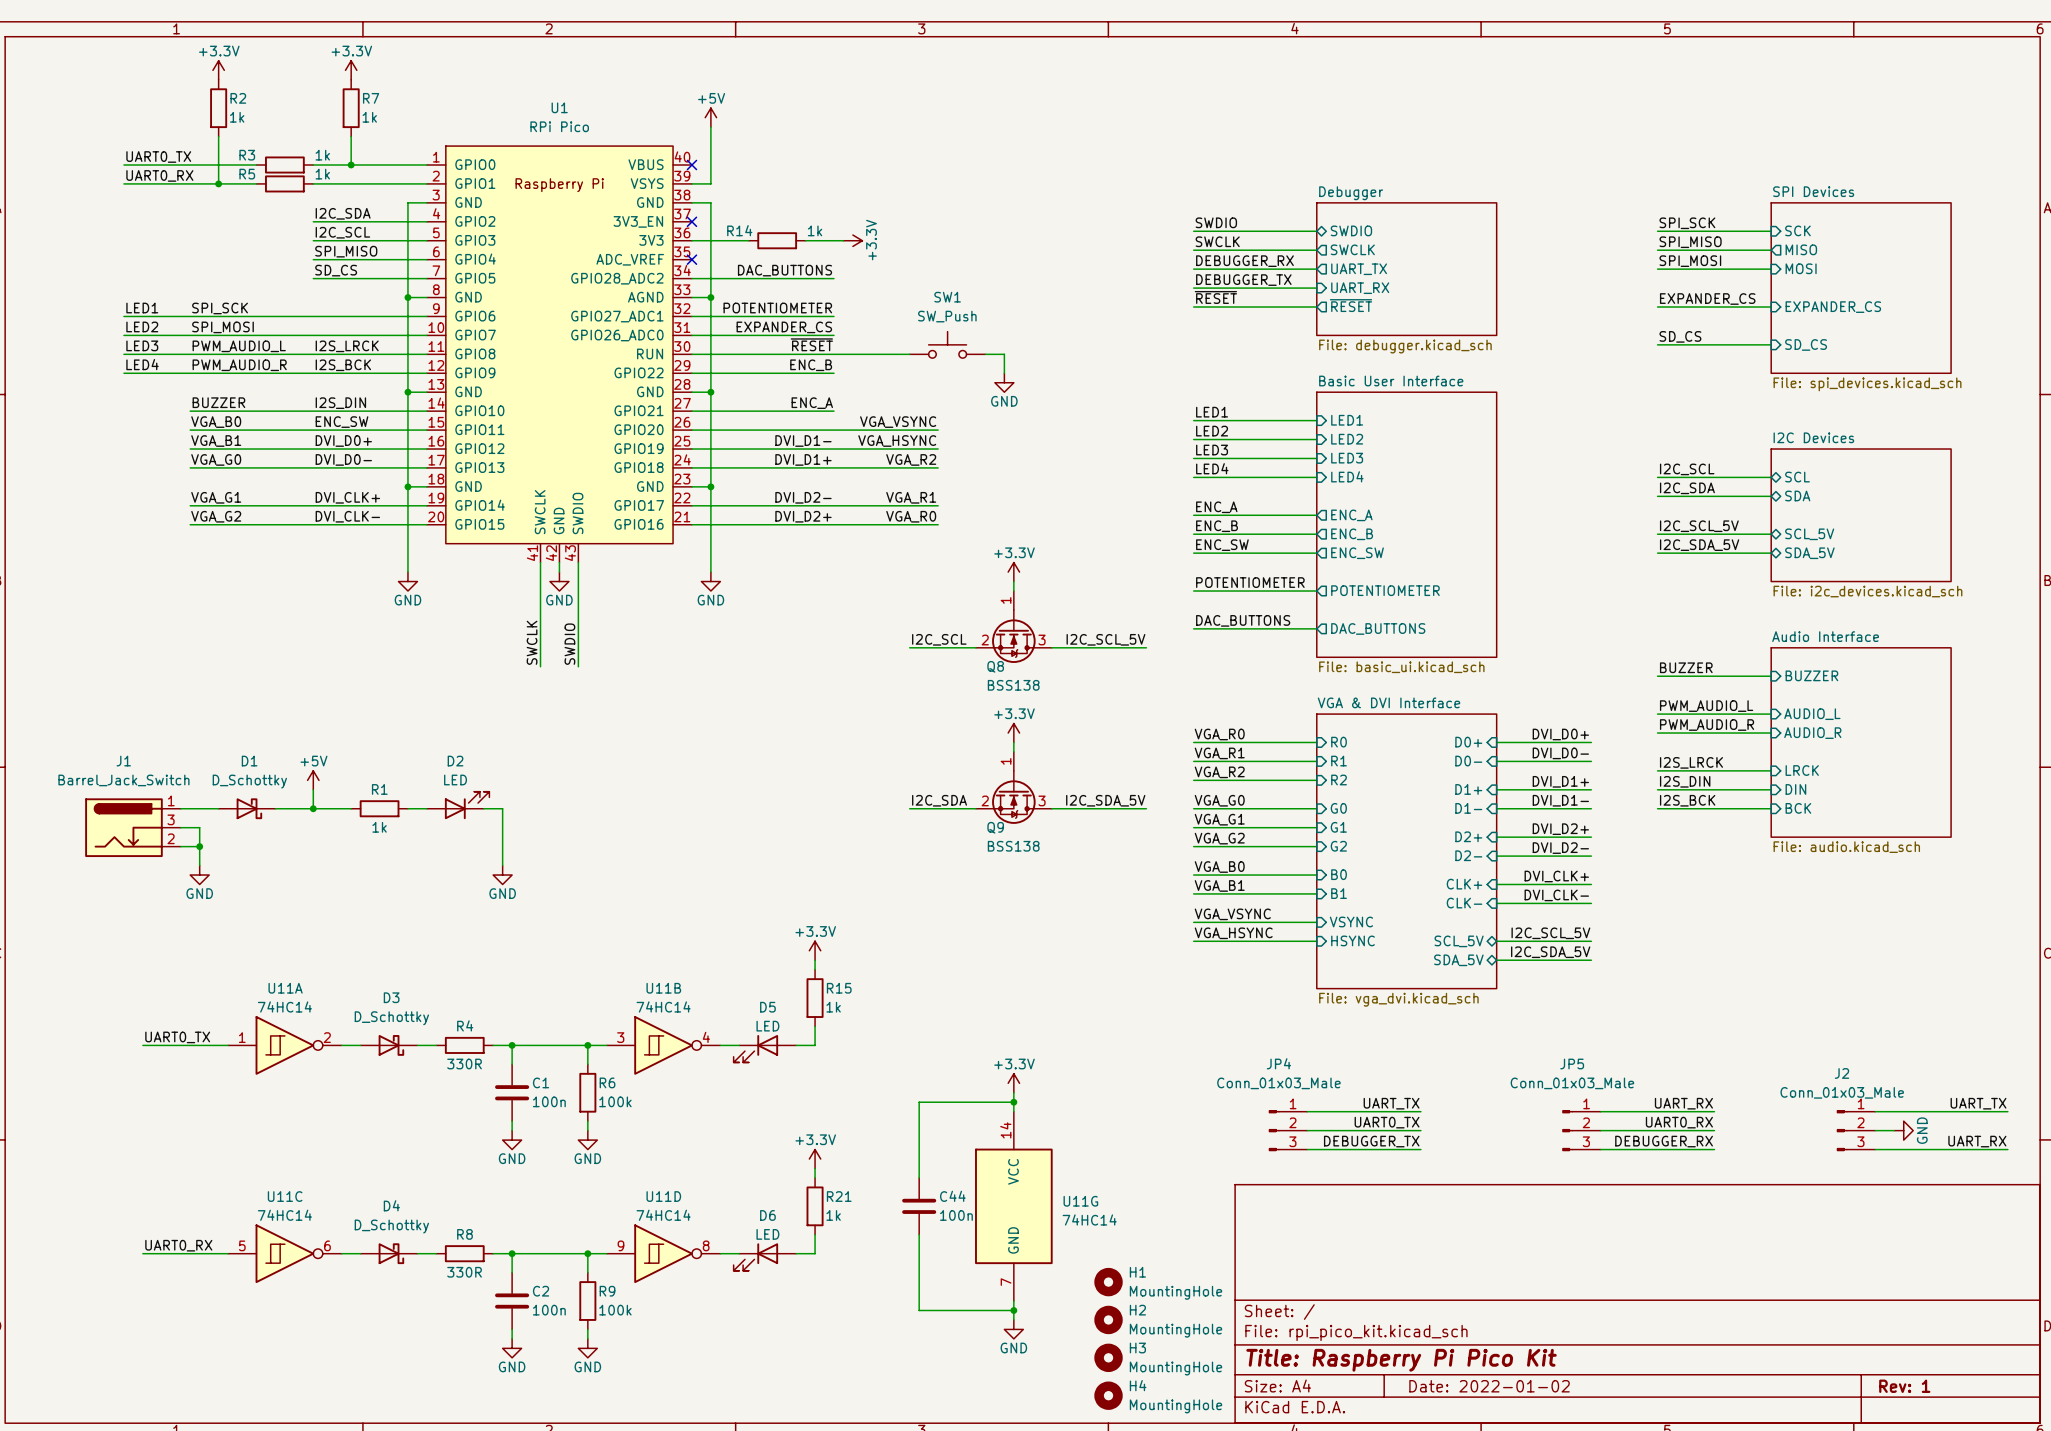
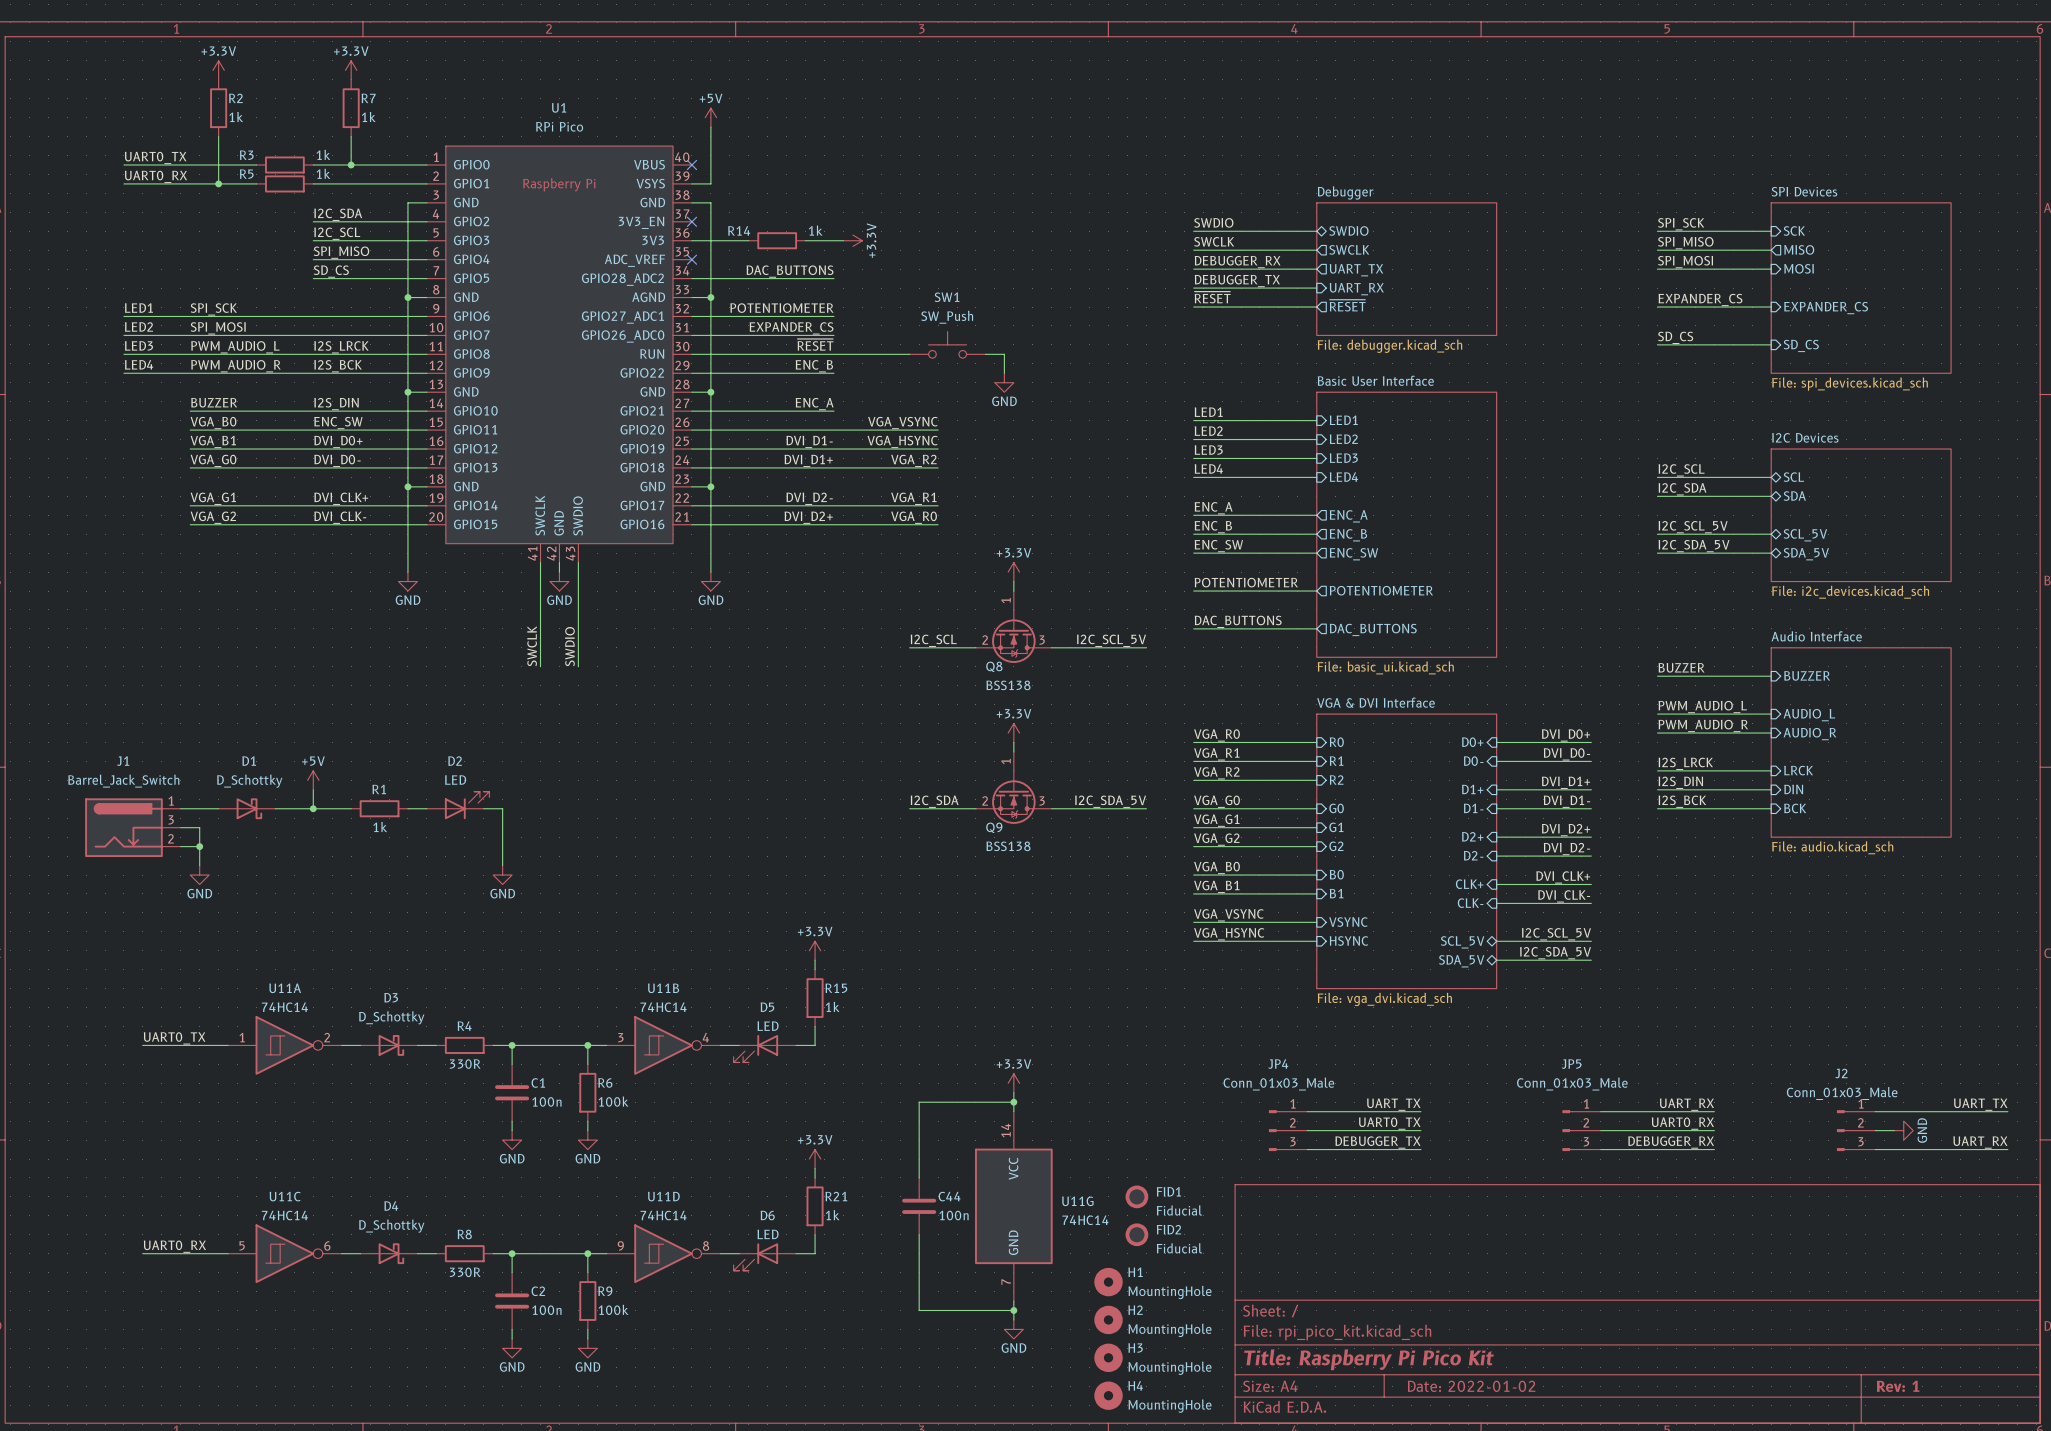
FID1: none -> Fiducial (1136, 1196)
FID2: none -> Fiducial (1136, 1234)

